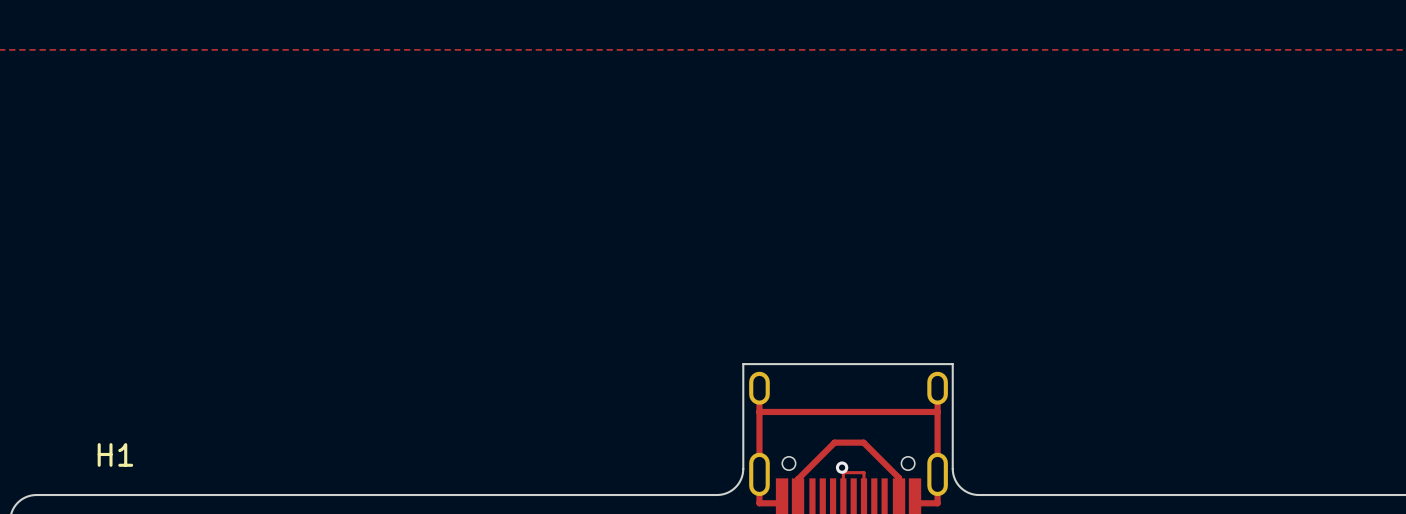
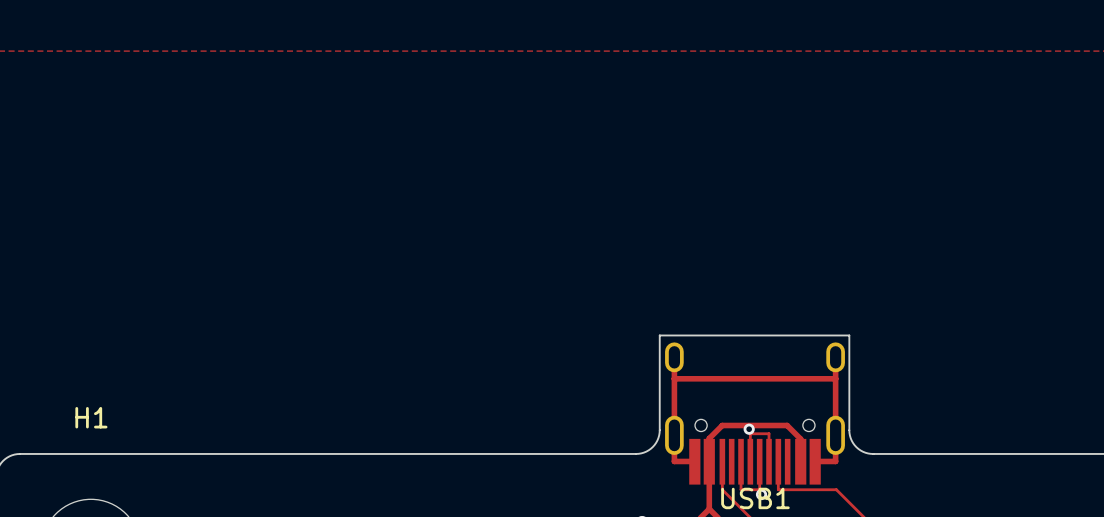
track: (899, 478) (863, 442) (834, 442) (798, 479) -> (800, 439) (787, 425) (722, 425) (709, 439)

